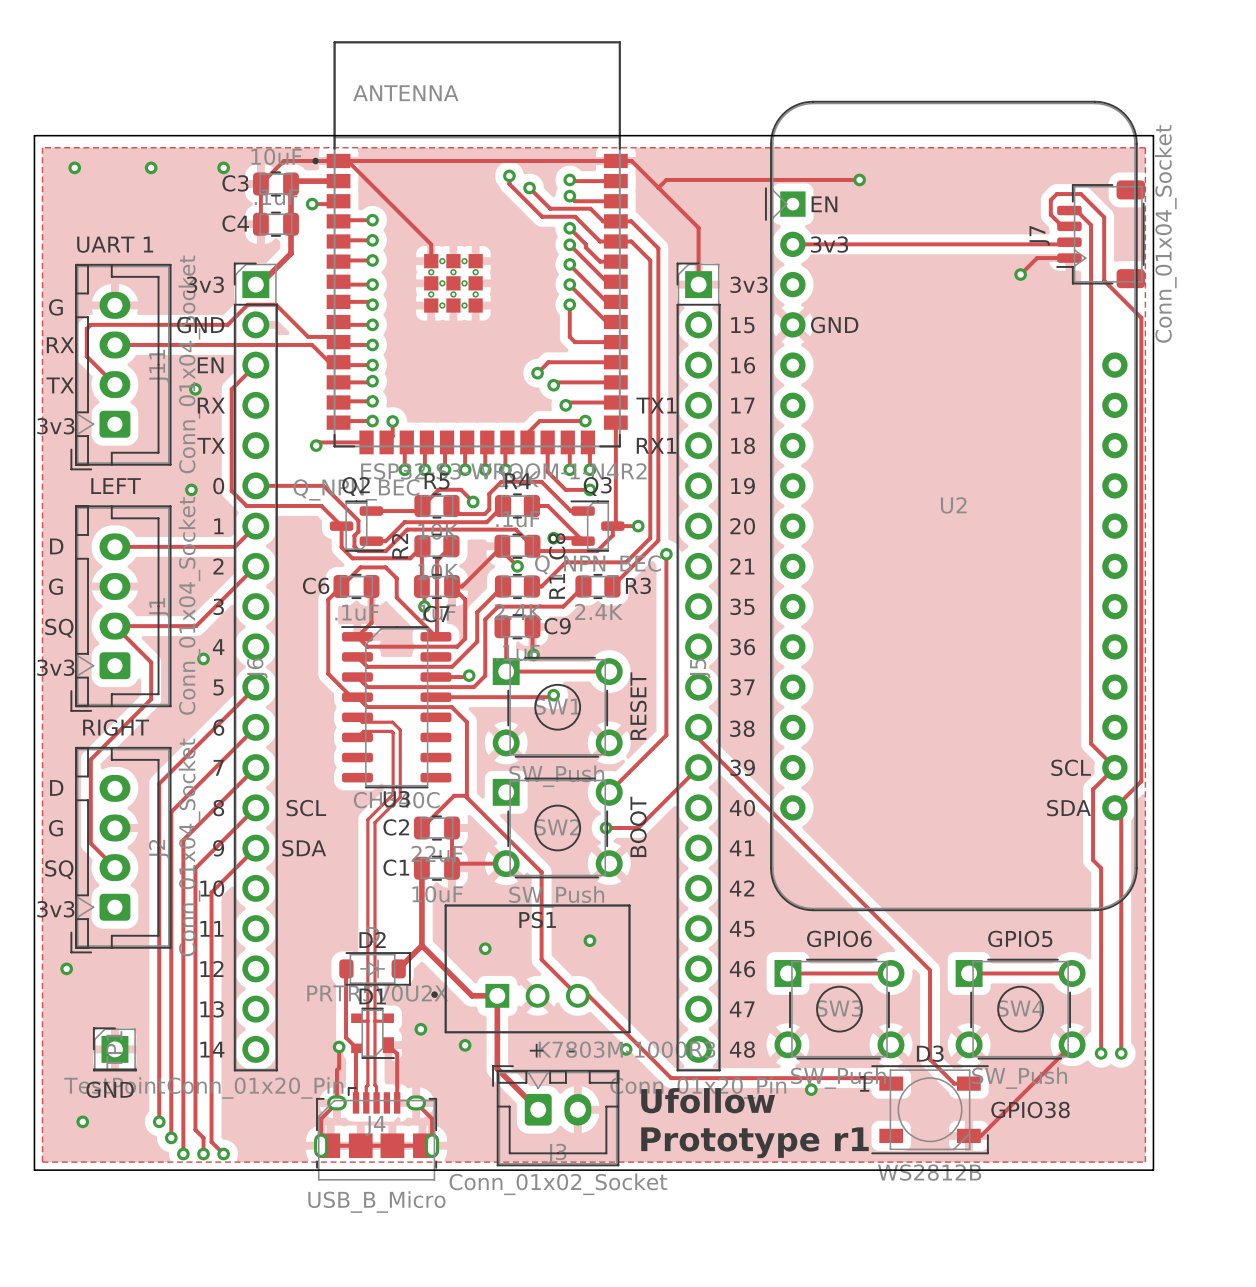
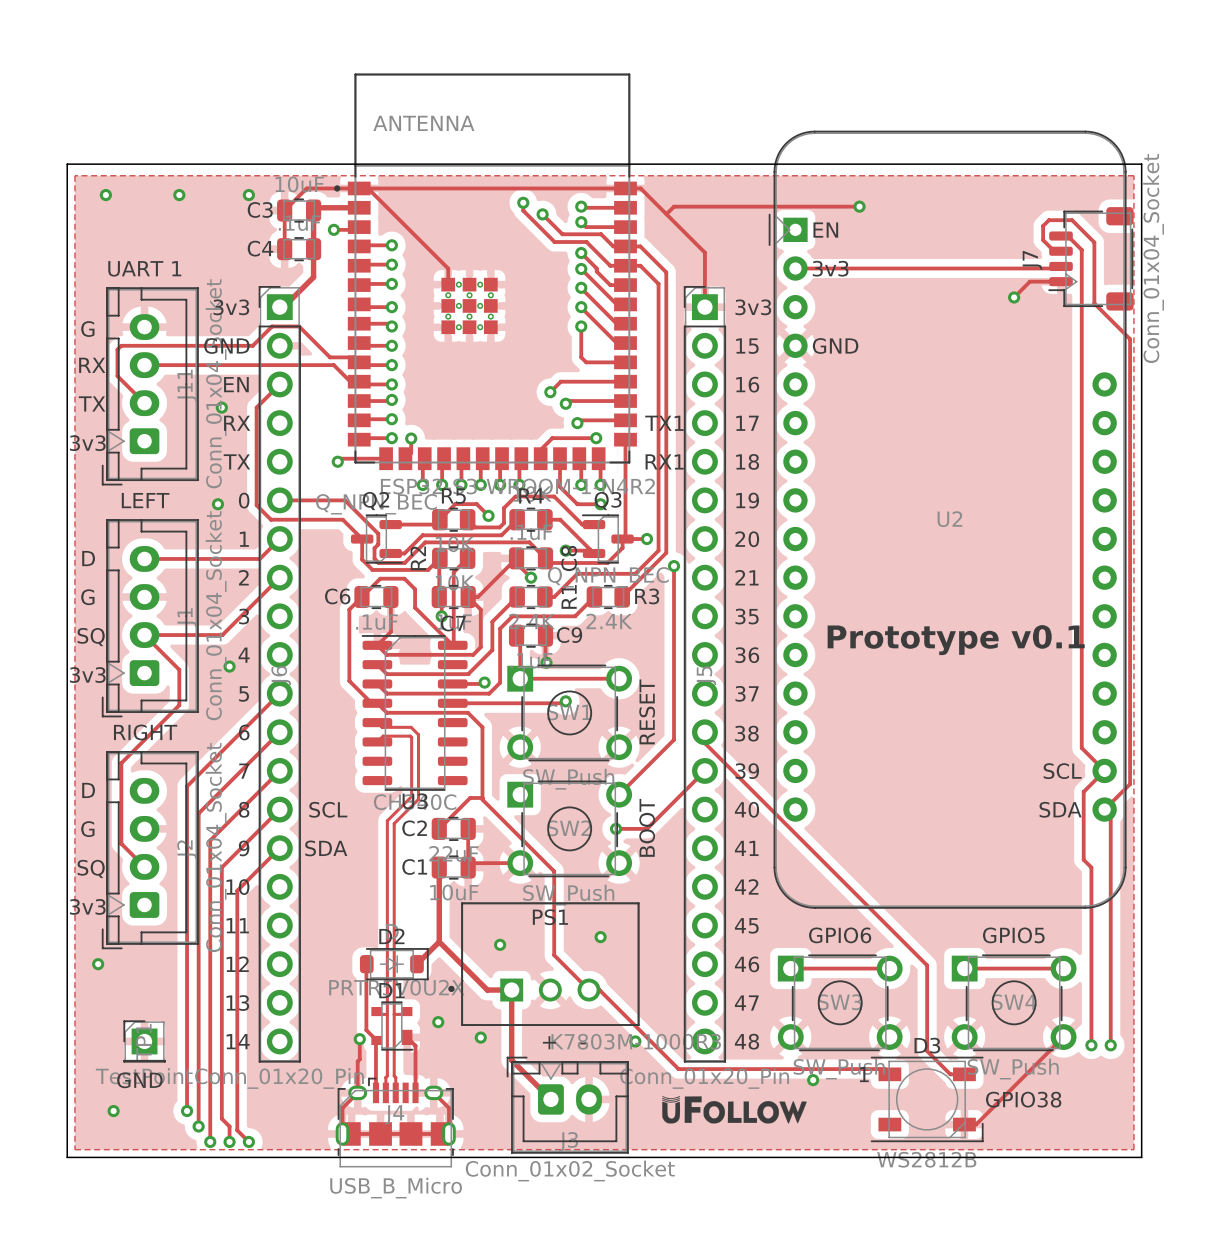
text: none -> Prototype v0.1 (956, 640)
text: Ufollow (708, 1100) -> none
drawing: none -> [662, 1095, 807, 1124]
text: Prototype r1 (754, 1142) -> none

